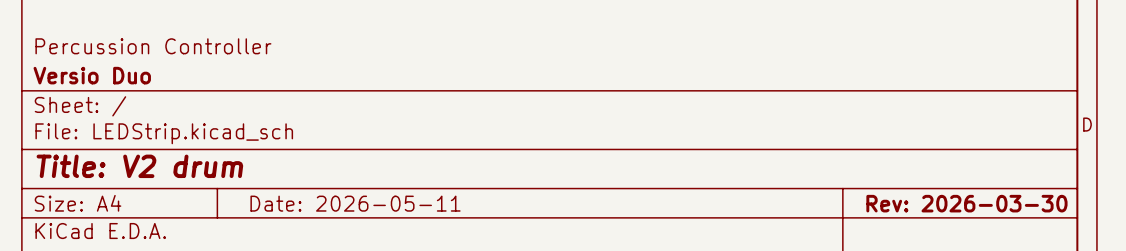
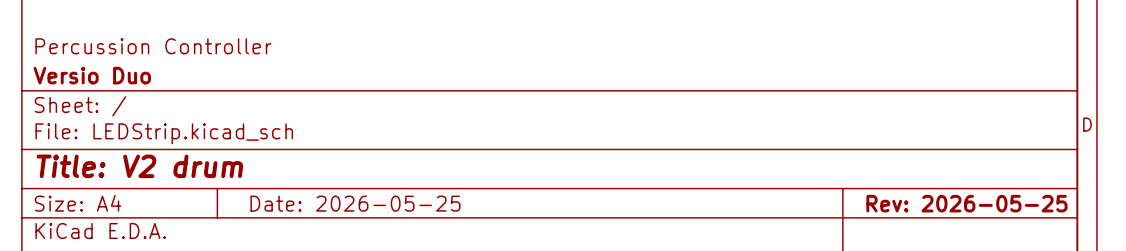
title block: Date: 2026-05-11 (355, 203) -> Date: 2026-05-25 (355, 203)
title block: Rev: 2026-03-30 (966, 203) -> Rev: 2026-05-25 (966, 203)

